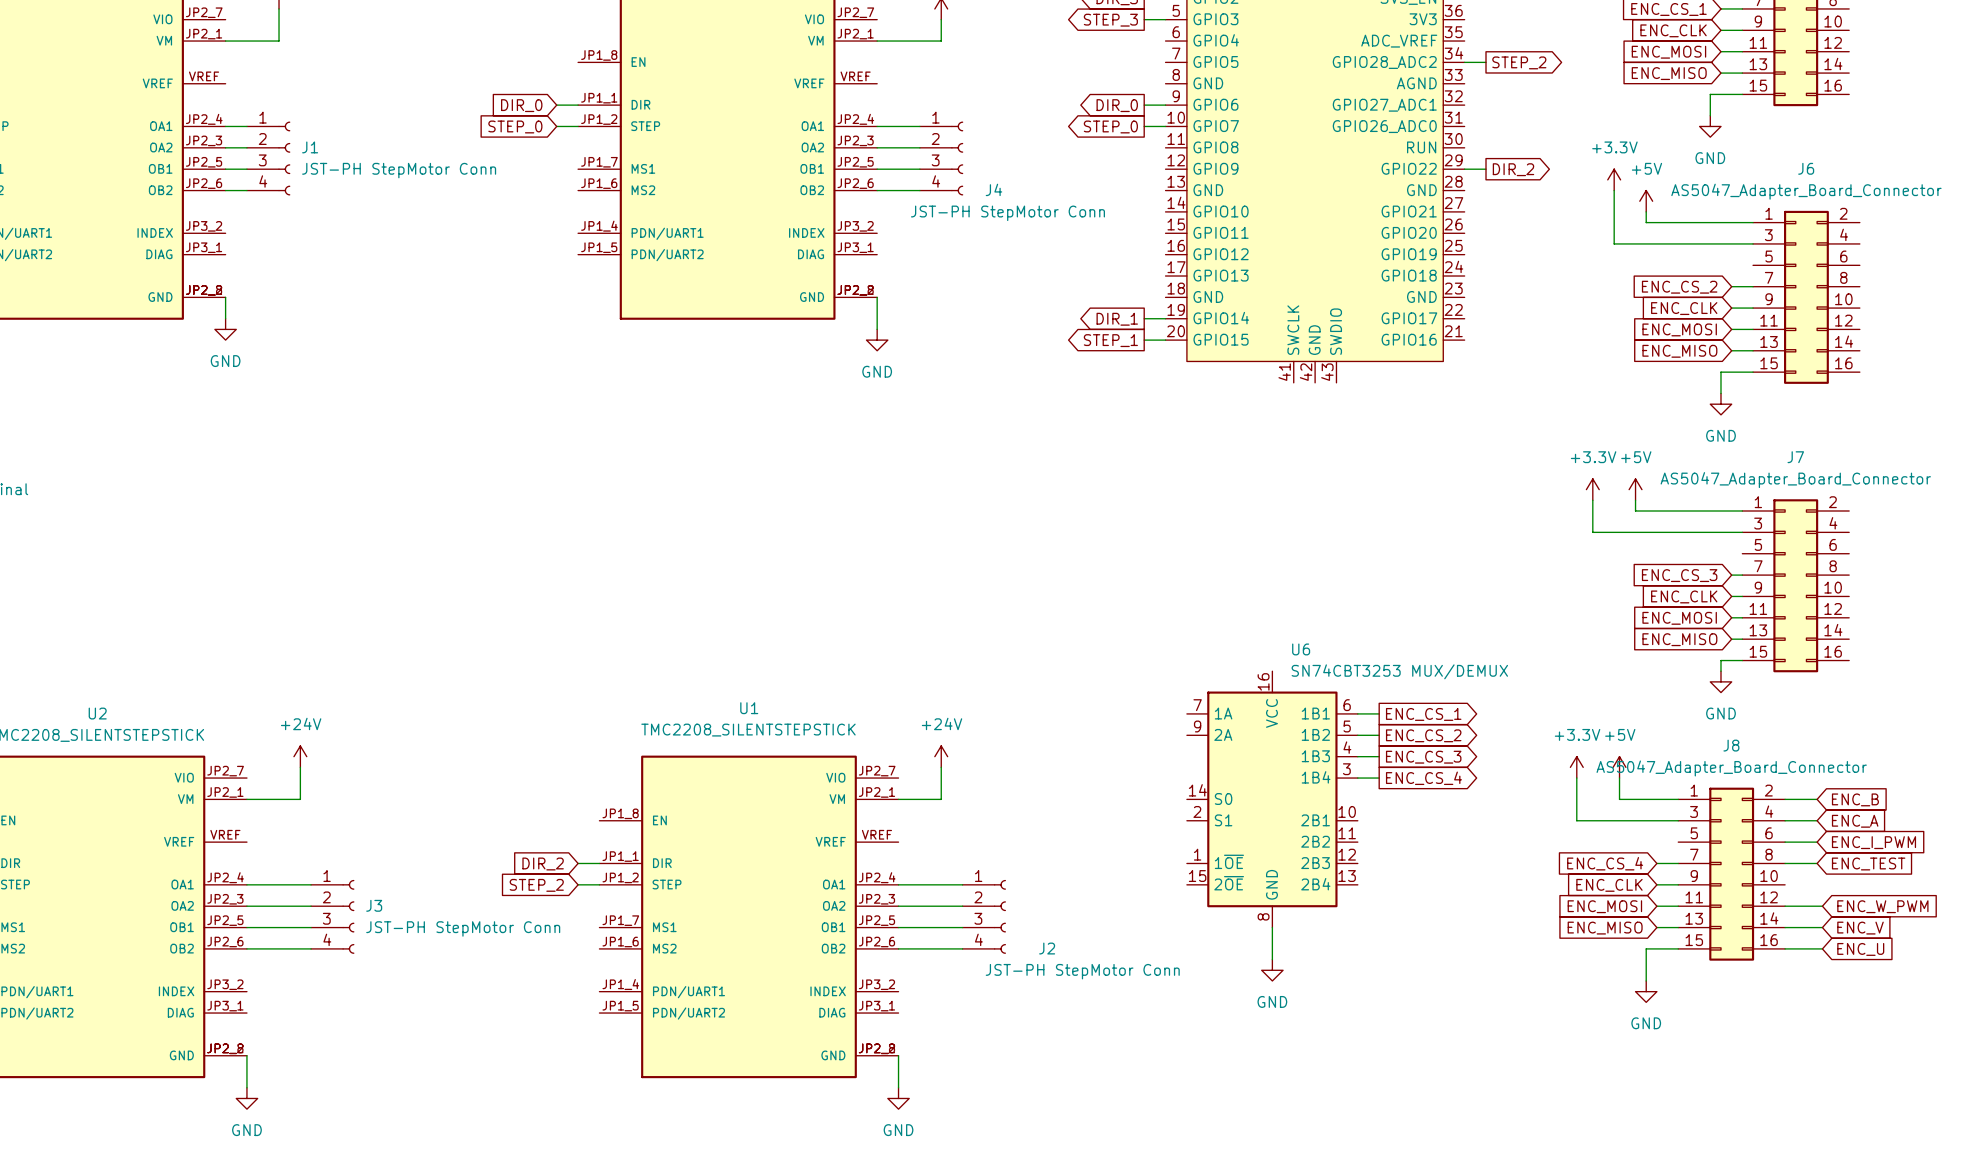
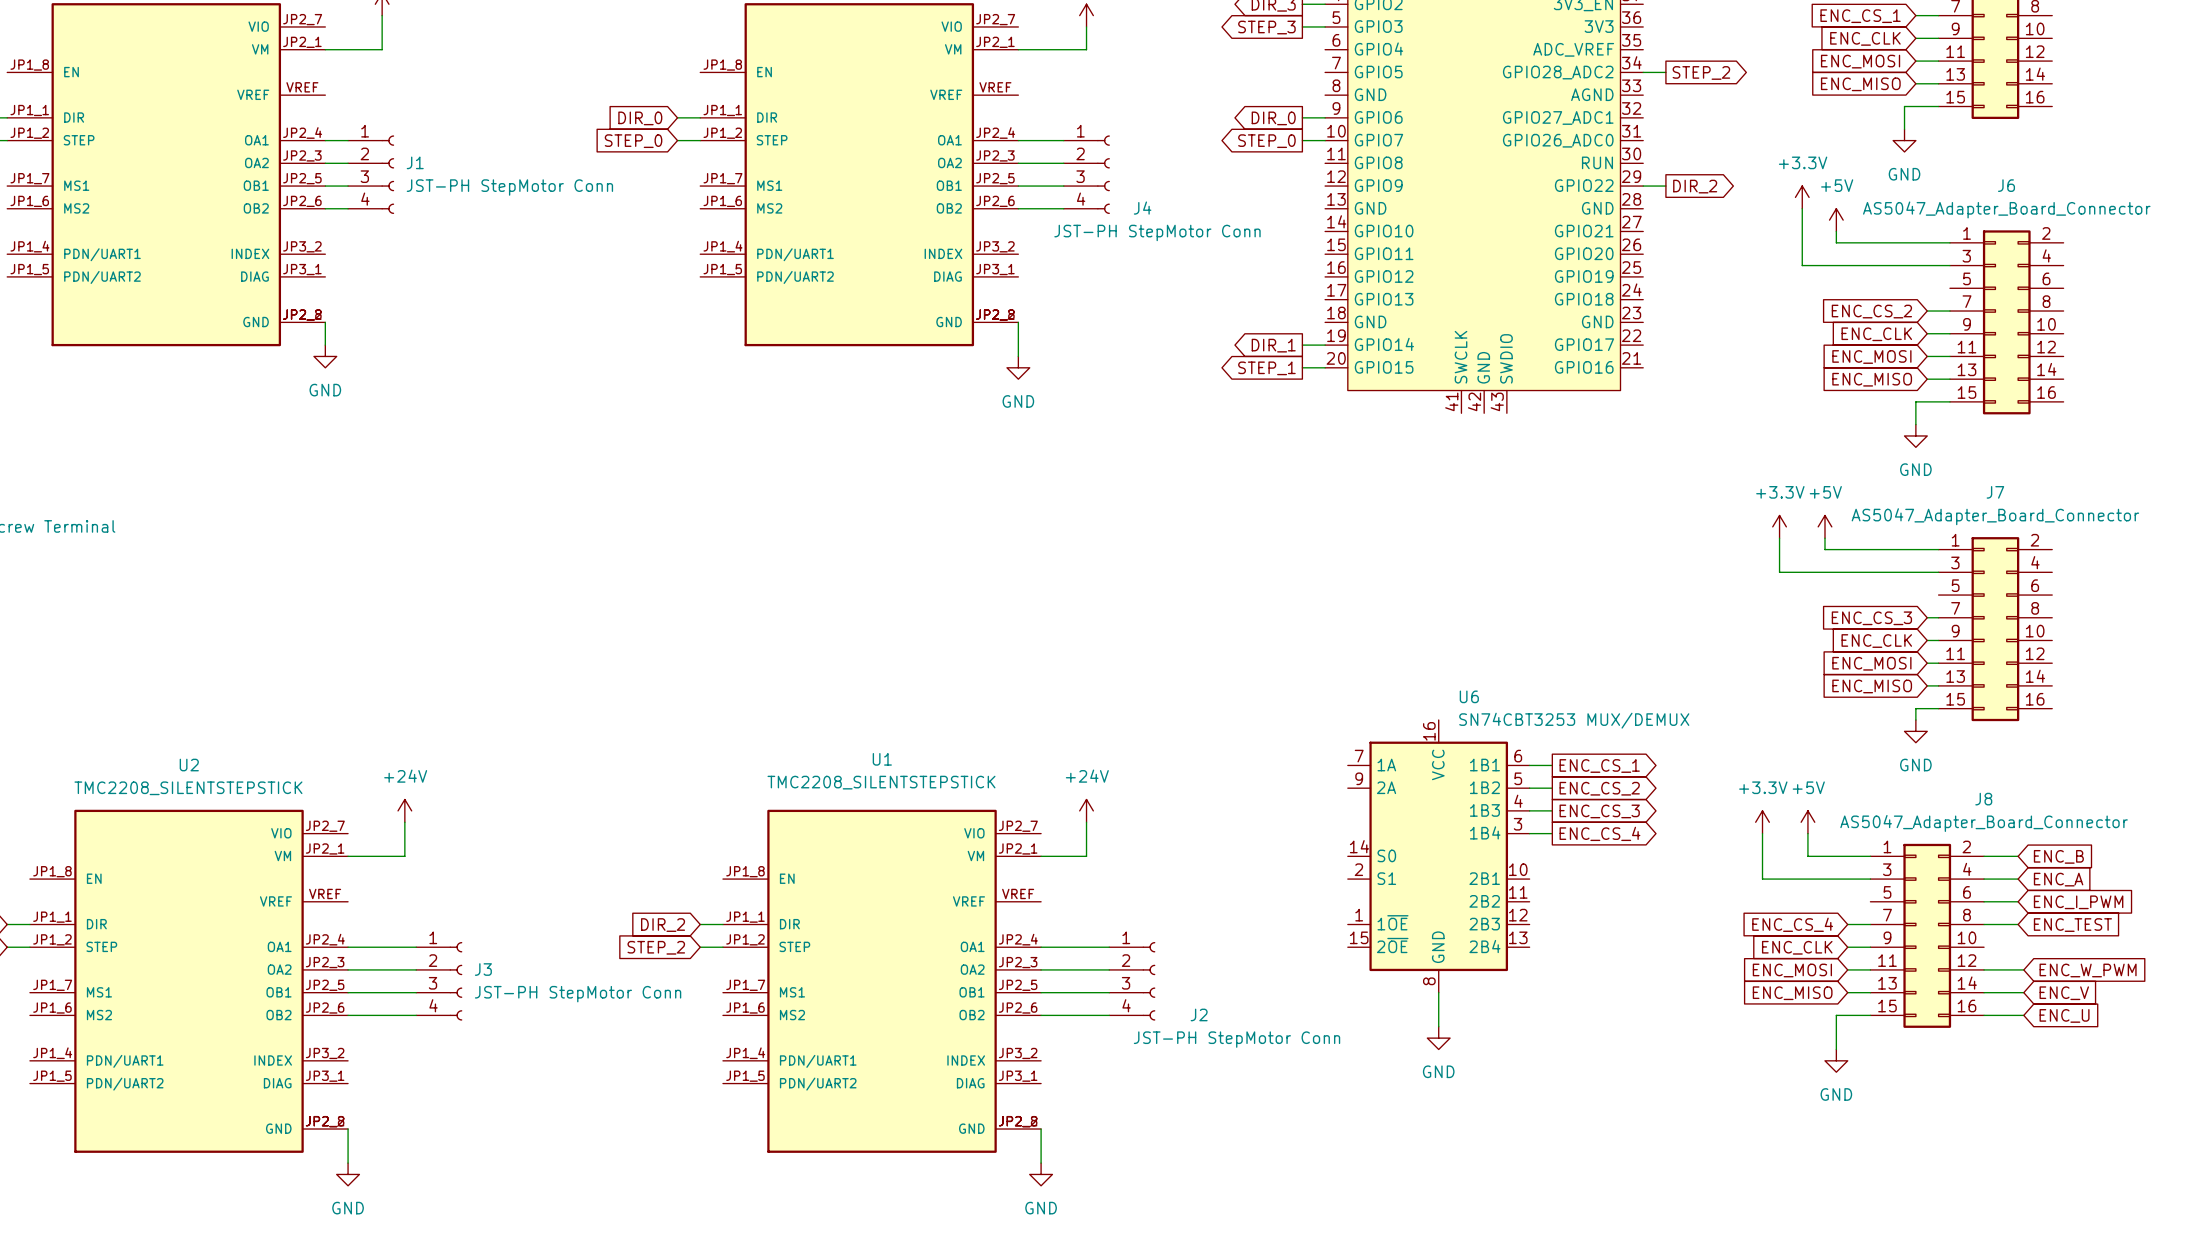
J8 name position: J8 (1731, 745) -> J8 (1983, 799)
J8 value position: AS5047_Adapter_Board_Connector (1731, 768) -> AS5047_Adapter_Board_Connector (1984, 823)

